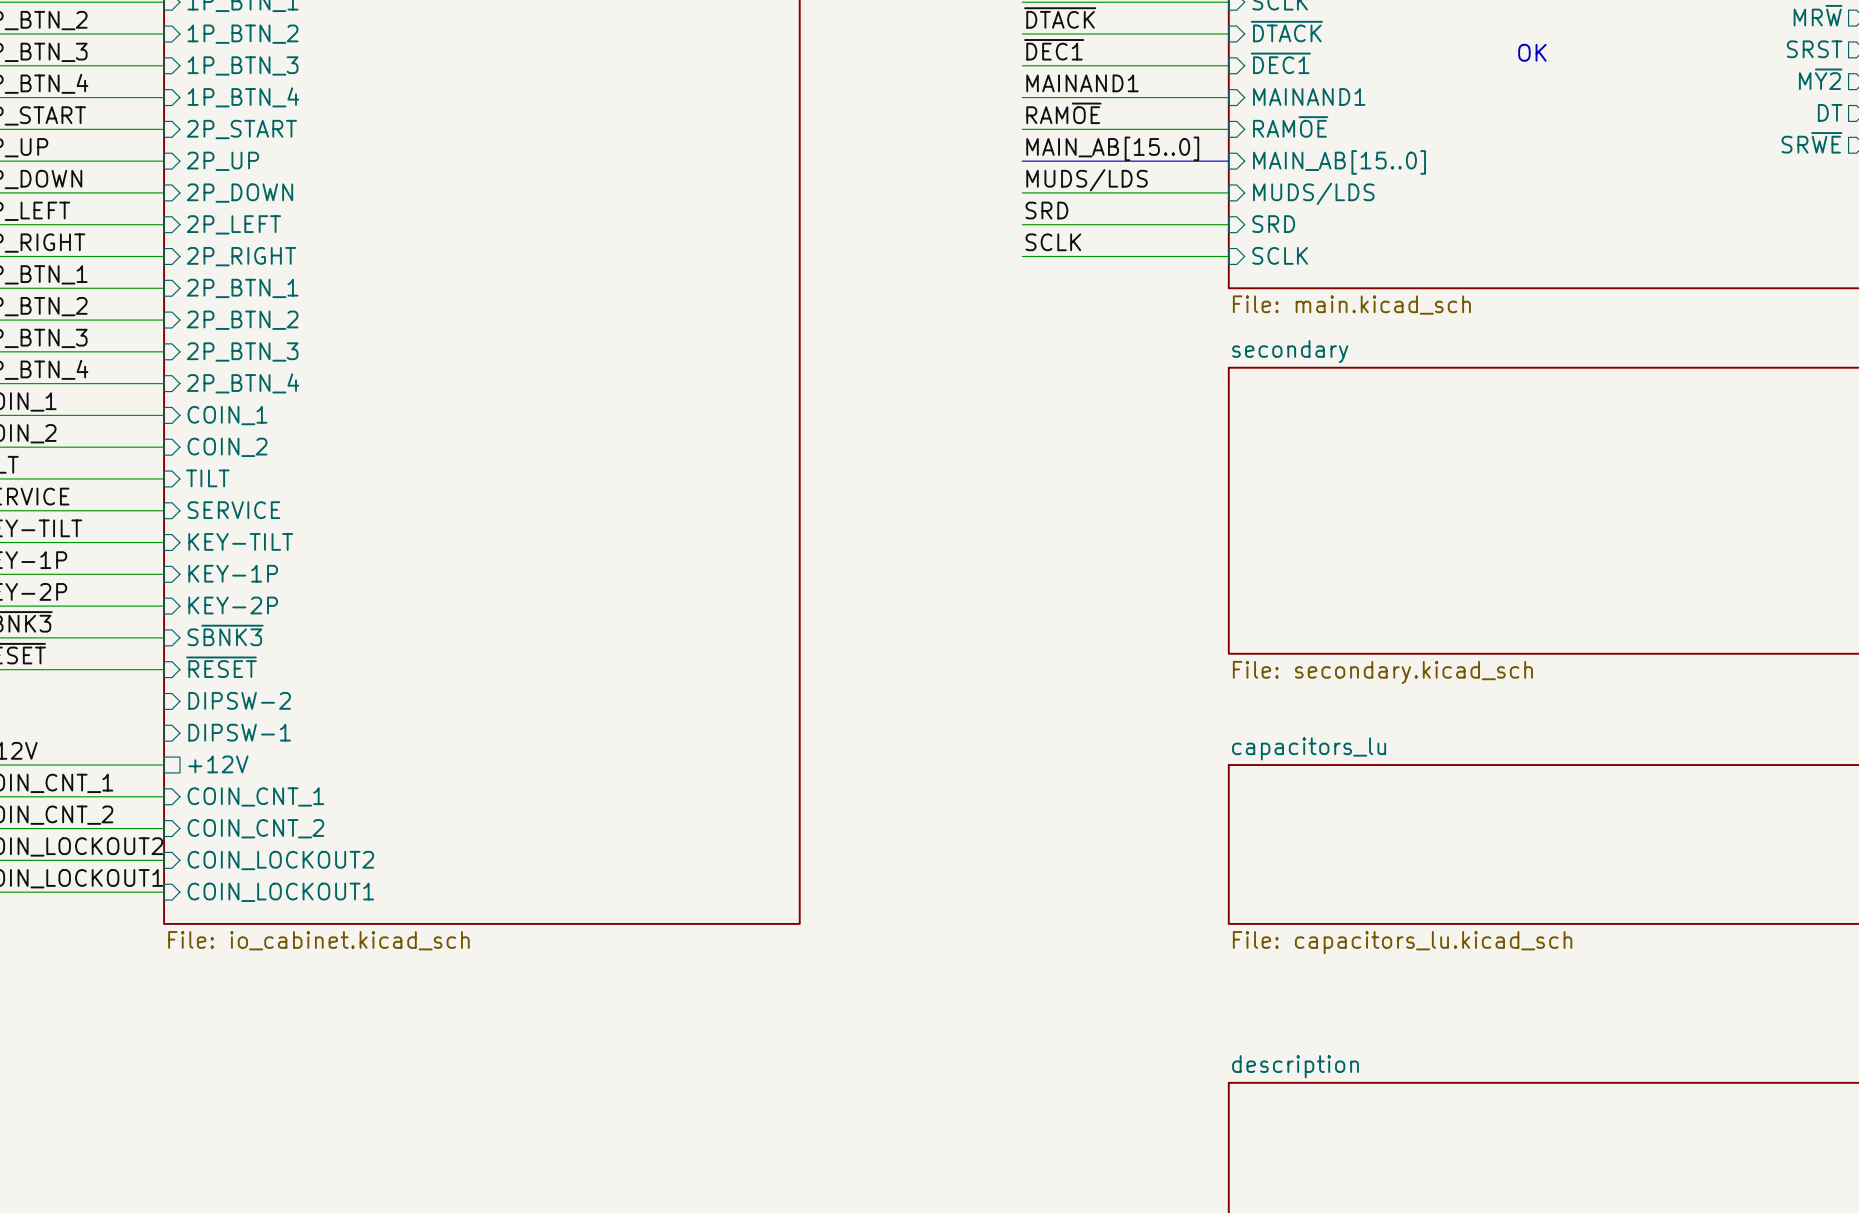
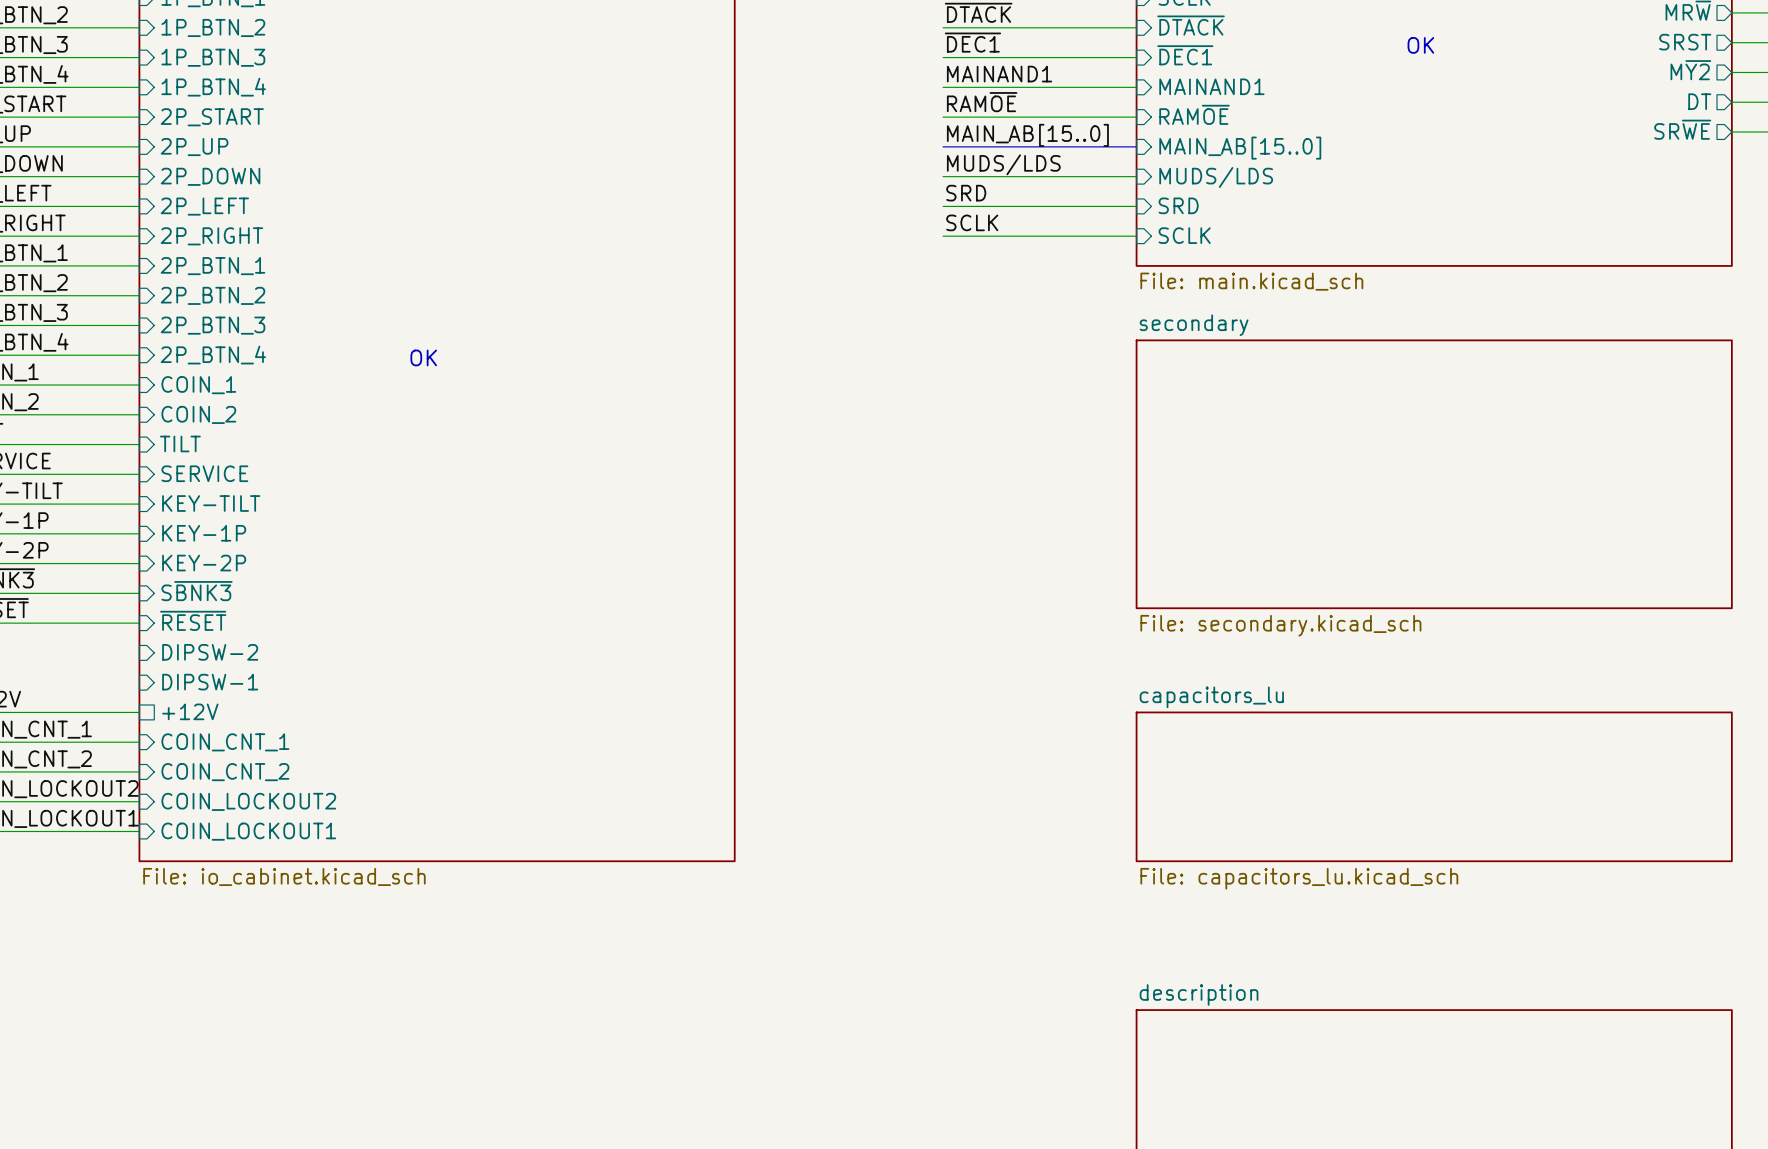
text: none -> OK (423, 357)

